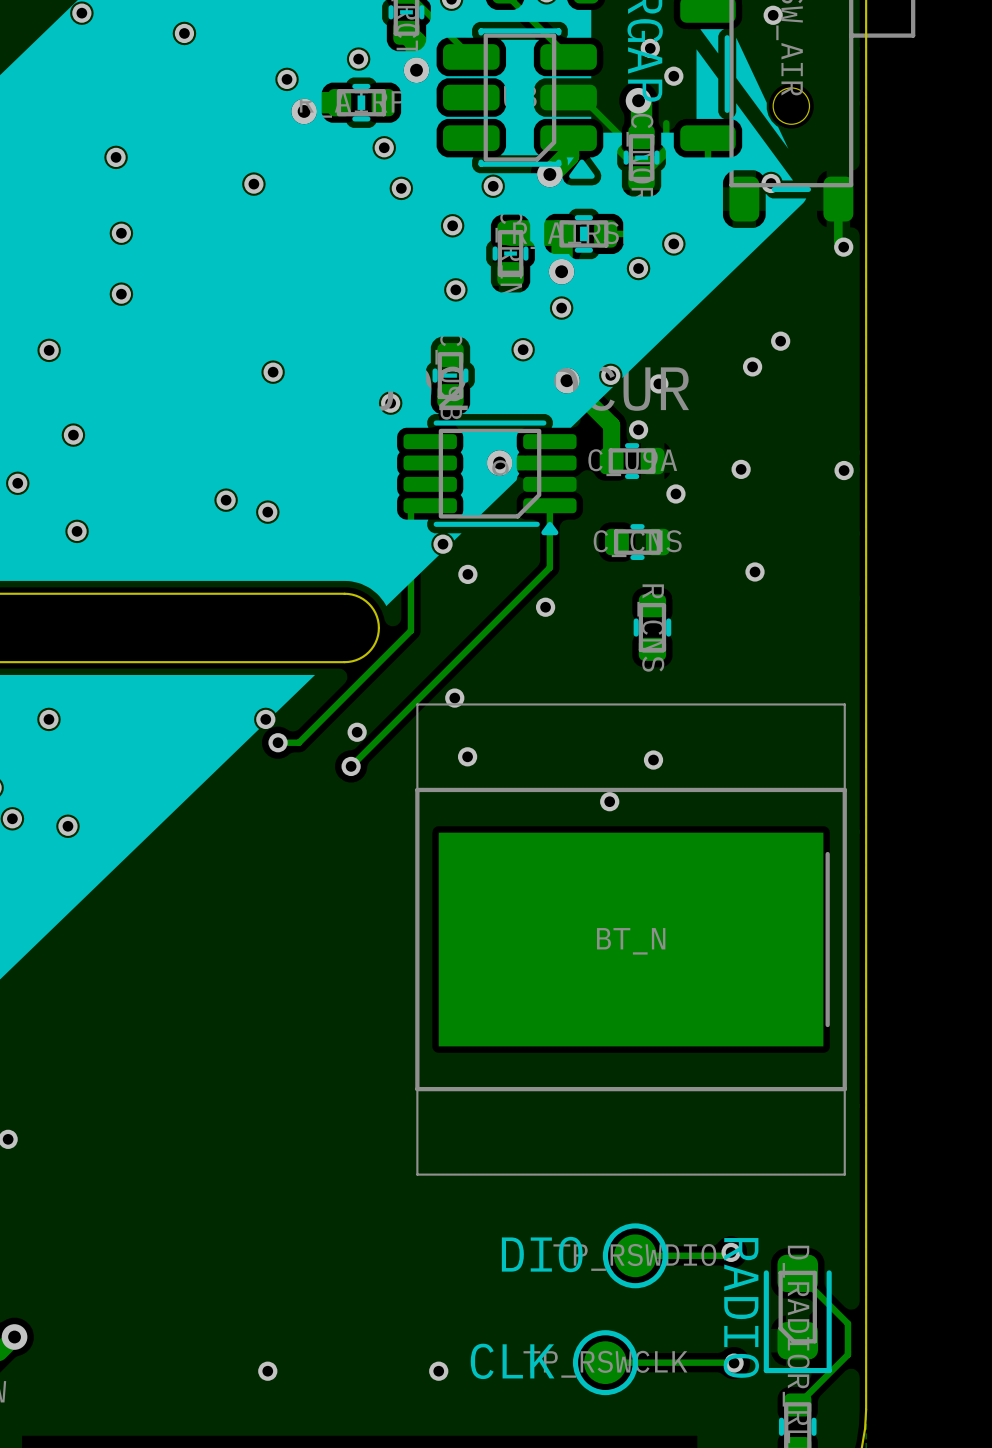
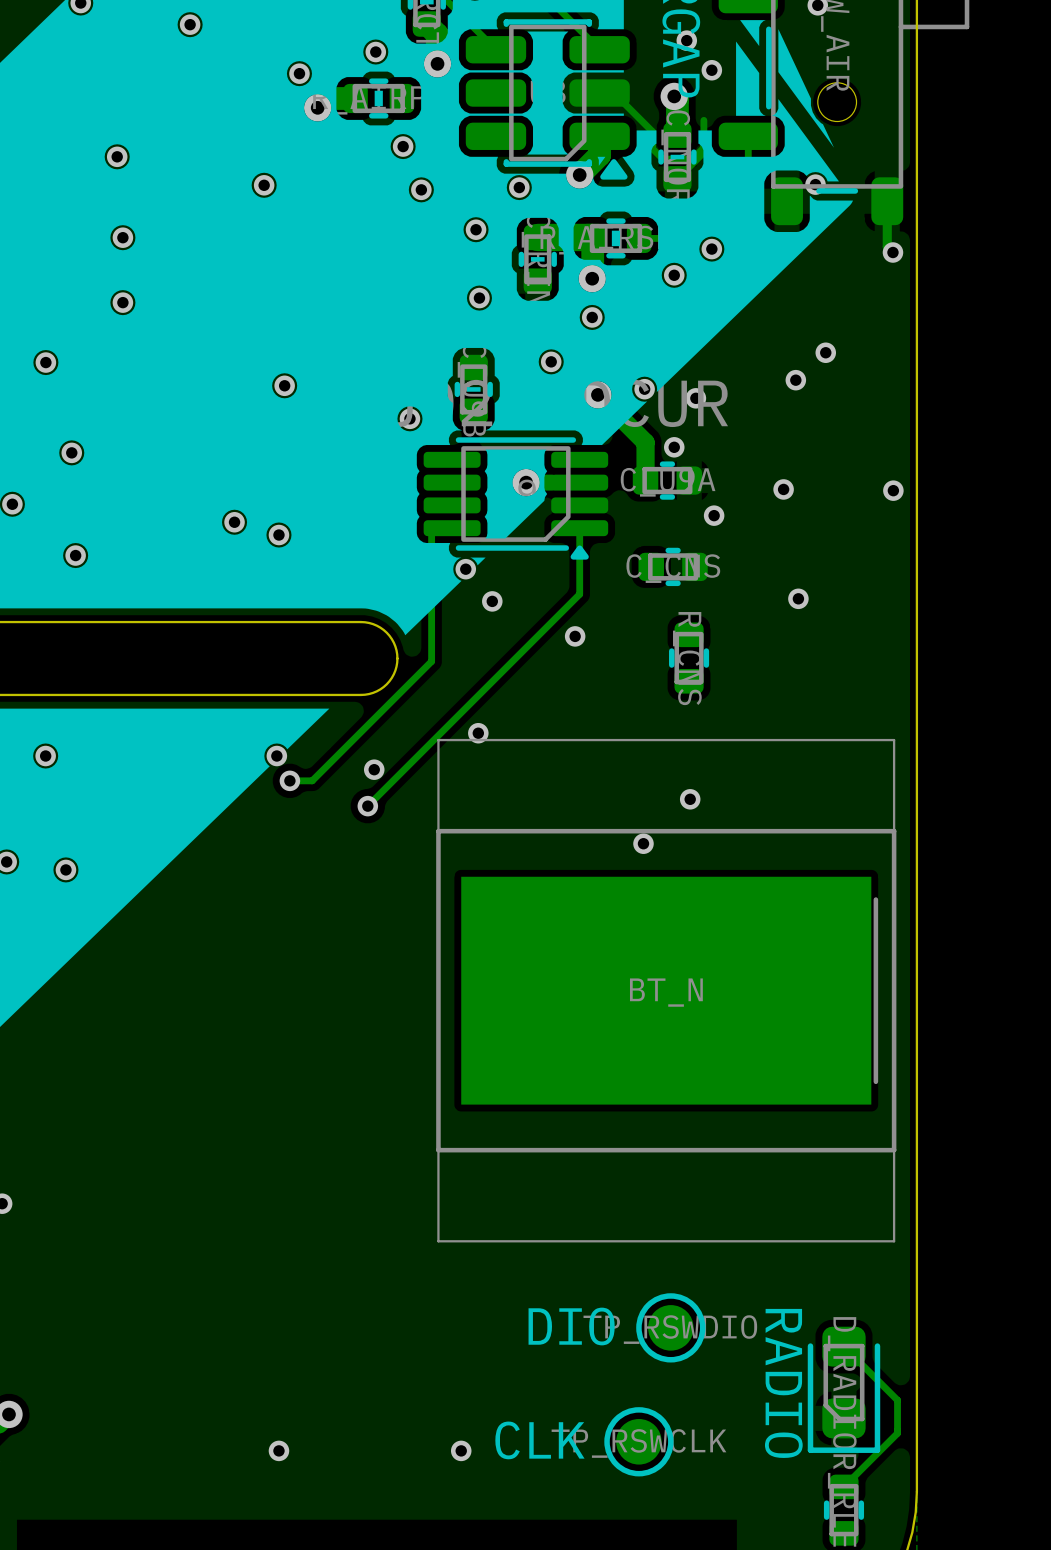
via: (467, 756) -> none
track: (731, 1252) (727, 1255) (635, 1255) -> none
via: (731, 1252) -> none
track: (733, 1362) (605, 1362) -> none
via: (734, 1363) -> none

